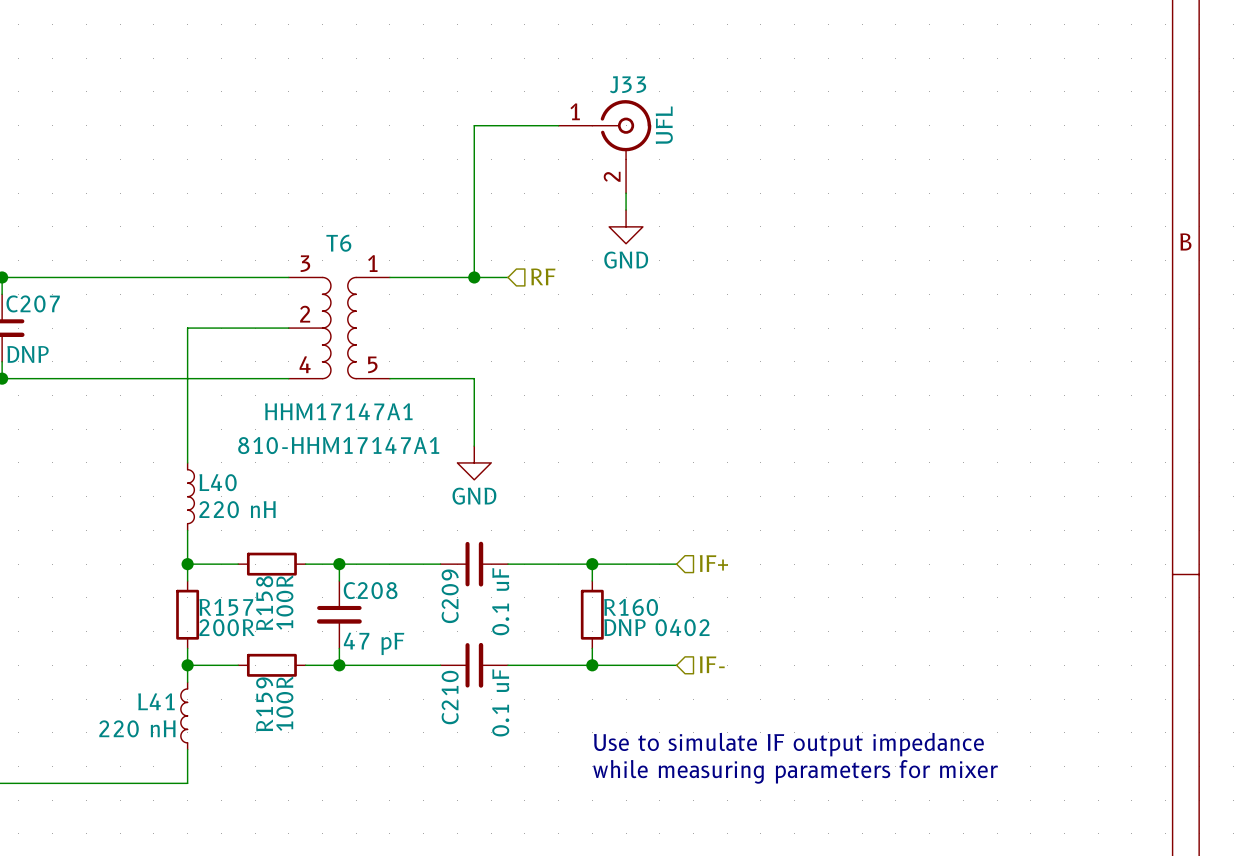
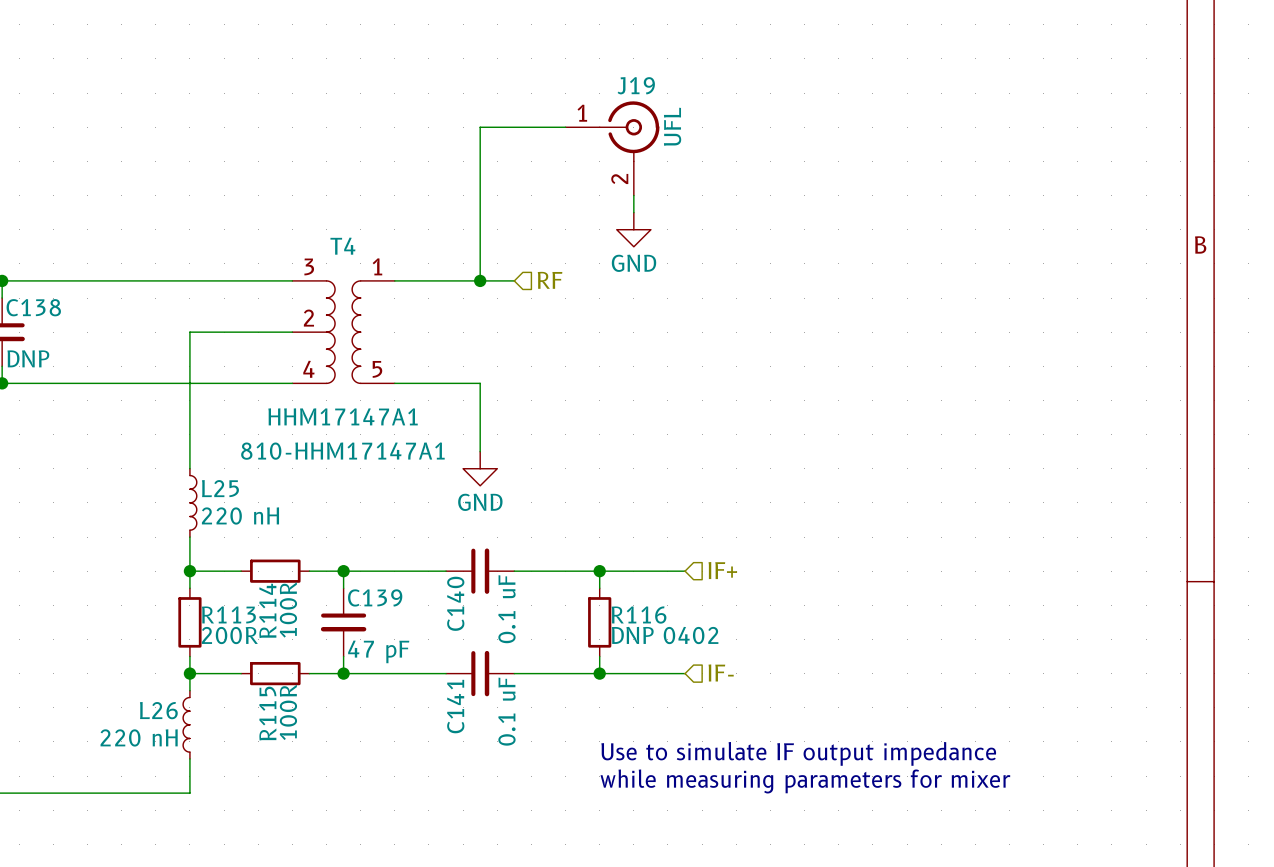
J33 name: J33 (628, 84) -> J19 (636, 85)
T6 name: T6 (338, 243) -> T4 (342, 246)
C207 name: C207 (33, 303) -> C138 (33, 307)
L40 name: L40 (218, 482) -> L25 (220, 488)
C208 name: C208 (370, 590) -> C139 (375, 597)
C209 name: C209 (450, 596) -> C140 (455, 603)
R158 name: R158 (264, 603) -> R114 (267, 610)
R157 name: R157 (226, 607) -> R113 (228, 614)
R160 name: R160 (631, 607) -> R116 (639, 615)
C210 name: C210 (450, 697) -> C141 (455, 706)
L41 name: L41 (156, 701) -> L26 (158, 710)
R159 name: R159 (264, 704) -> R115 (267, 713)

